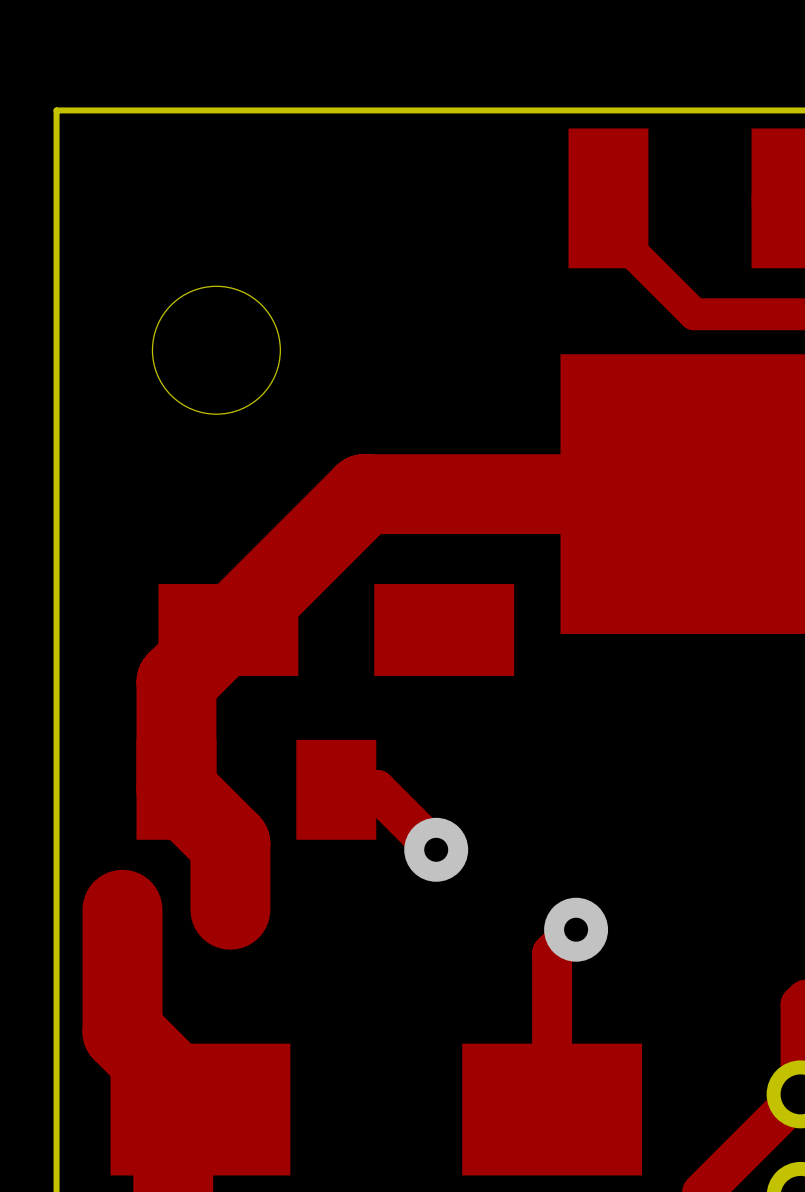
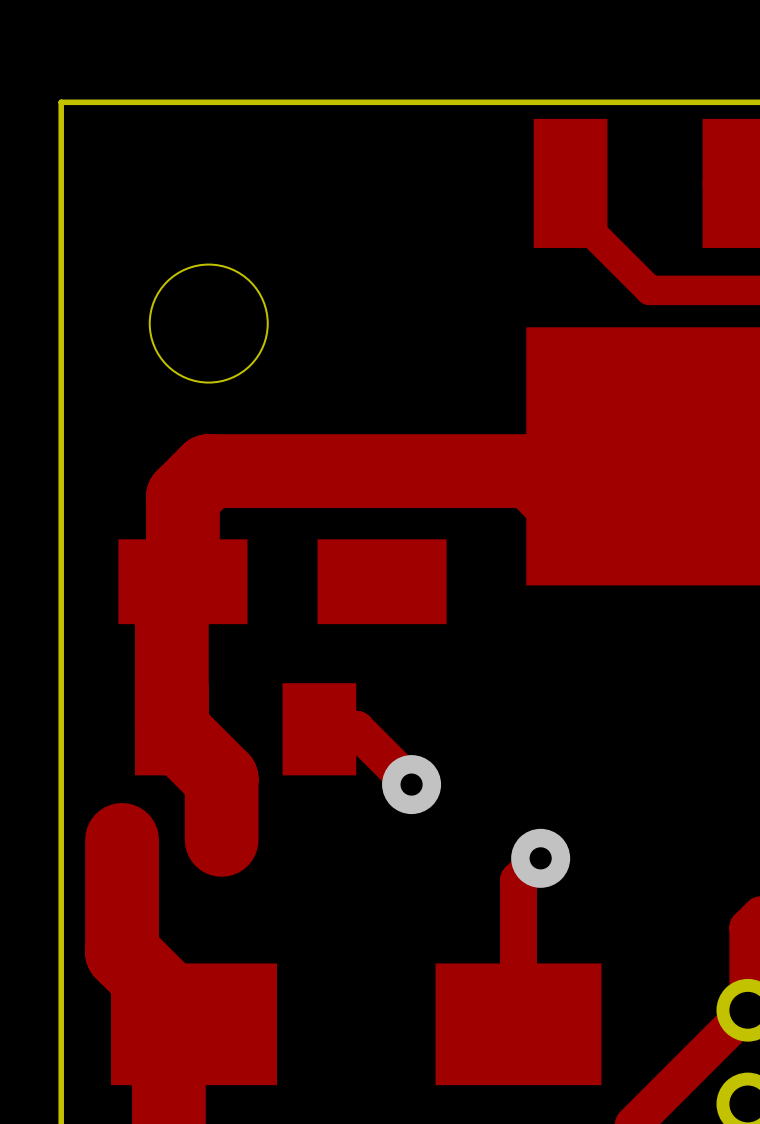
top track: (700, 494) (364, 494) (176, 681) -> (577, 544) (577, 517) (531, 471) (208, 471) (182, 496) (182, 581) (171, 592) (171, 629)
part position: (336, 629) -> (282, 581)

